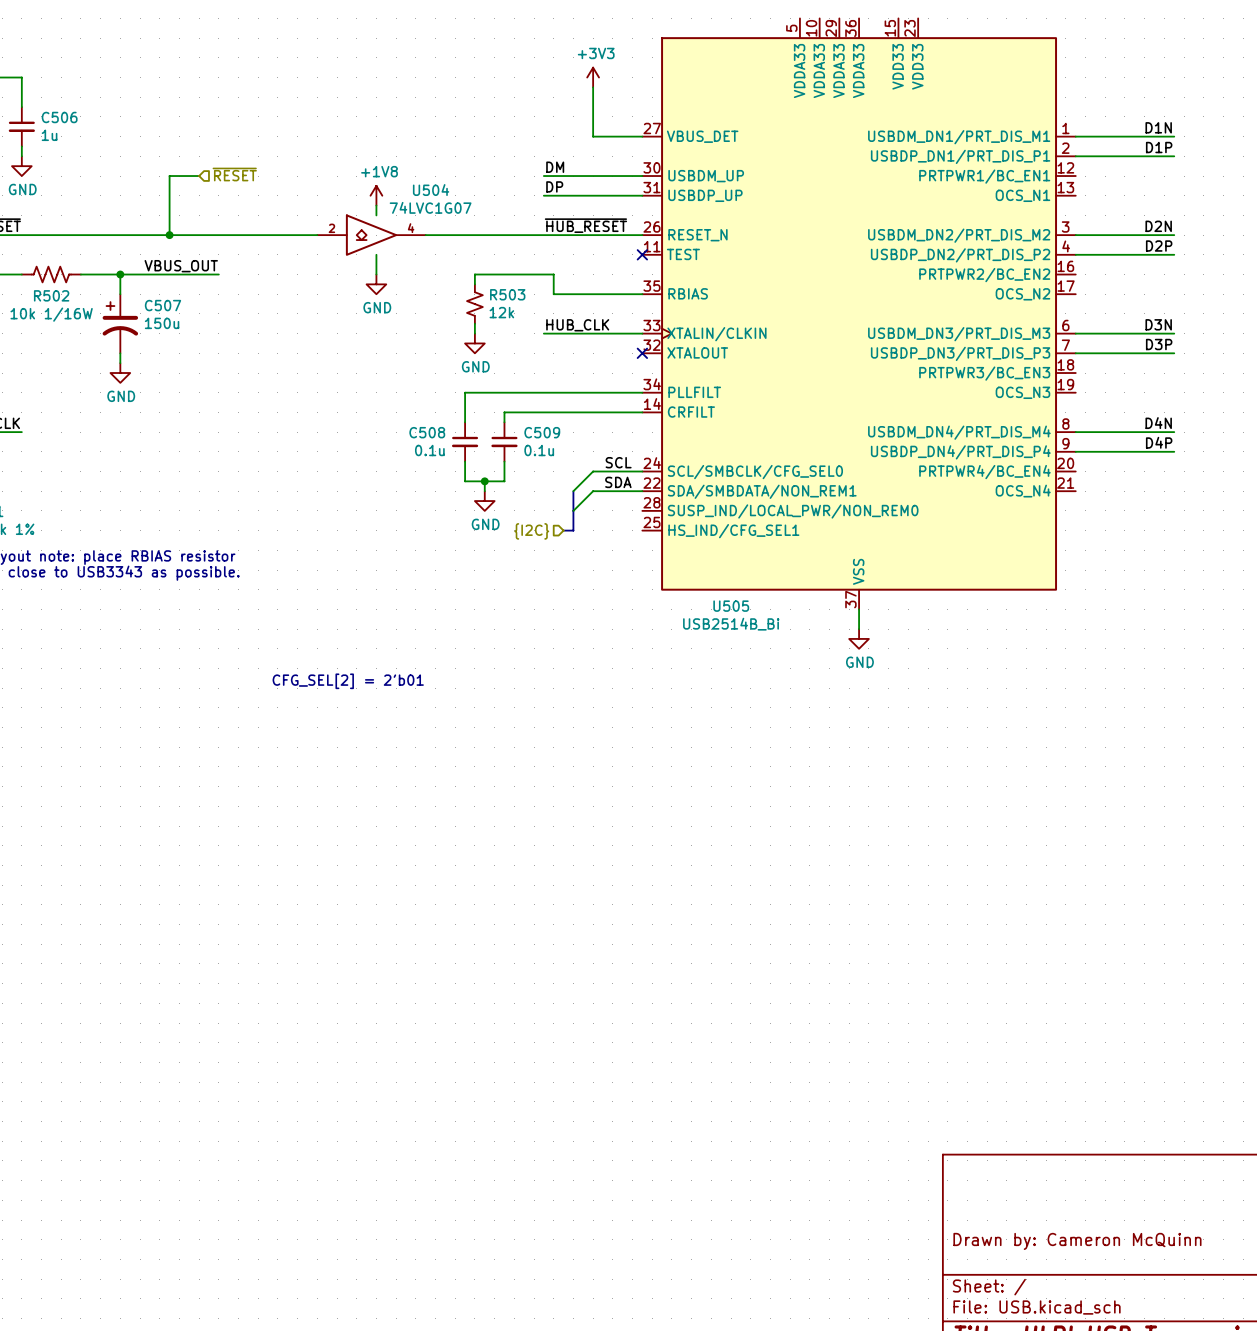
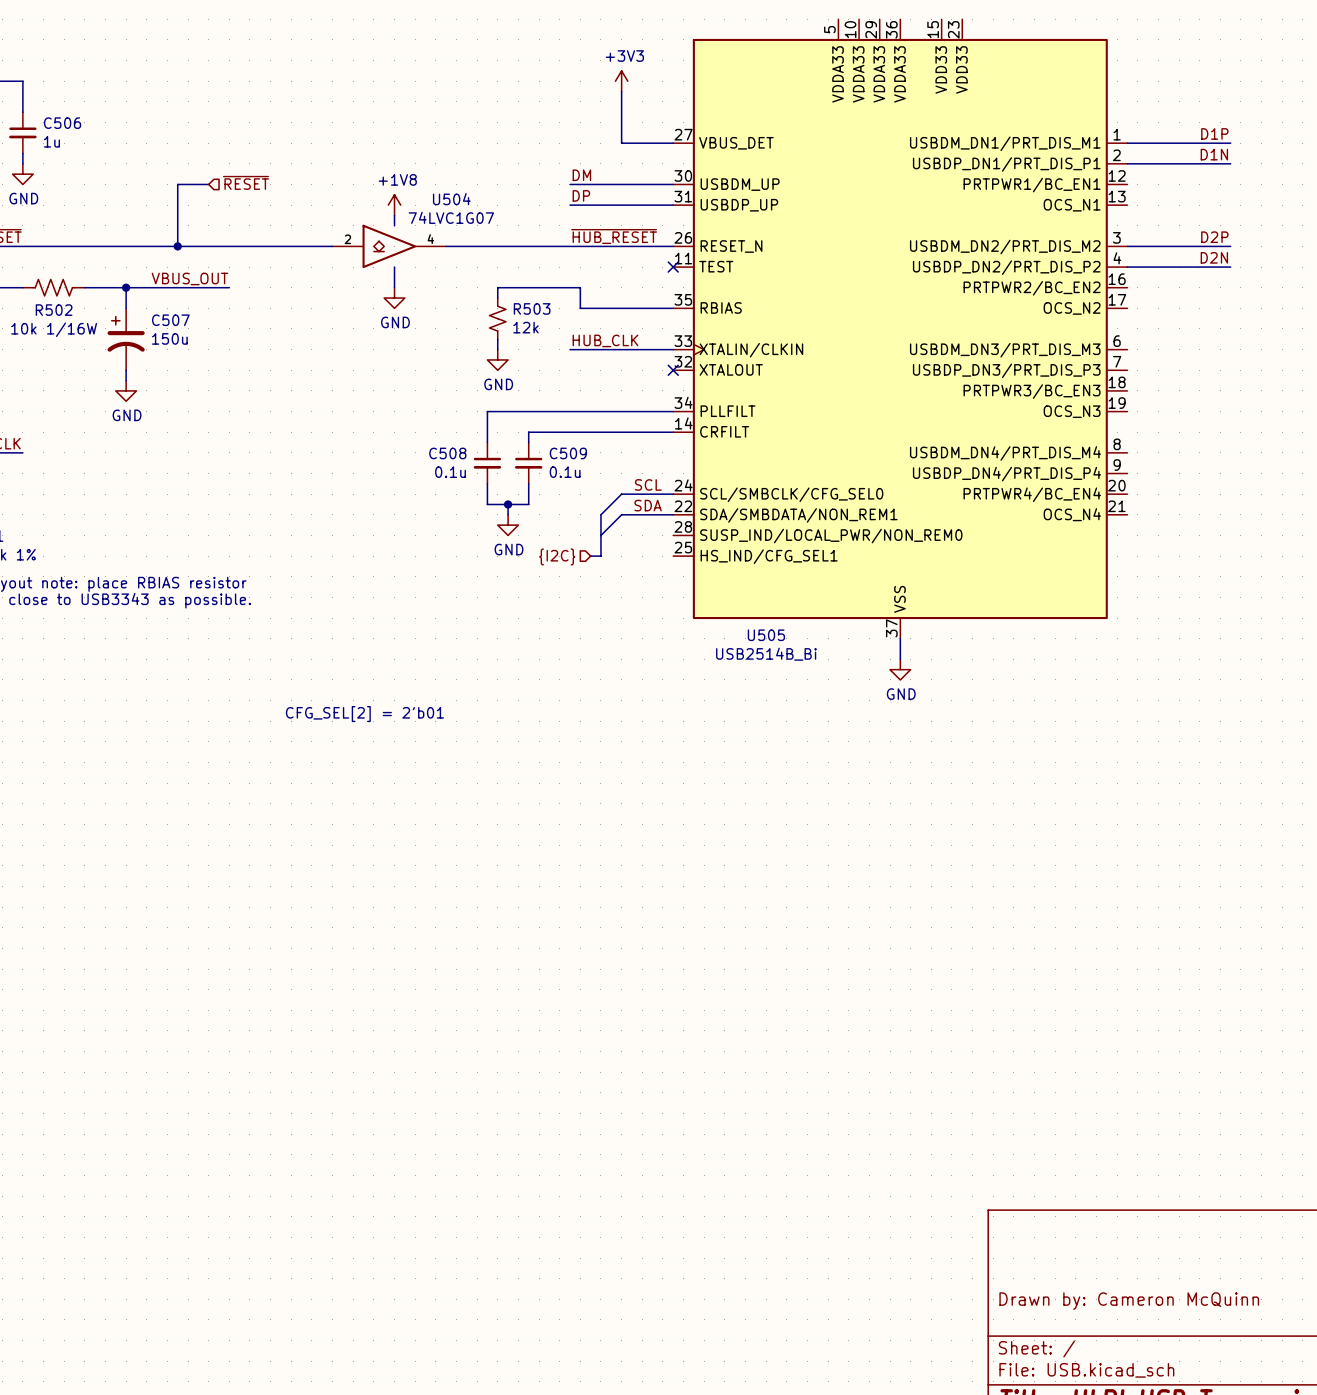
label: D1N (1158, 127) -> D1P (1214, 133)
label: D1P (1159, 147) -> D1N (1214, 154)
label: D2N (1158, 226) -> D2P (1214, 237)
label: D2P (1159, 246) -> D2N (1214, 257)
label: D3N (1158, 324) -> none
wire: (1075, 333) (1174, 333) -> none
label: D3P (1159, 344) -> none
wire: (1075, 353) (1174, 353) -> none
label: D4N (1158, 423) -> none
wire: (1075, 432) (1174, 432) -> none
label: D4P (1159, 442) -> none
wire: (1075, 451) (1174, 451) -> none

